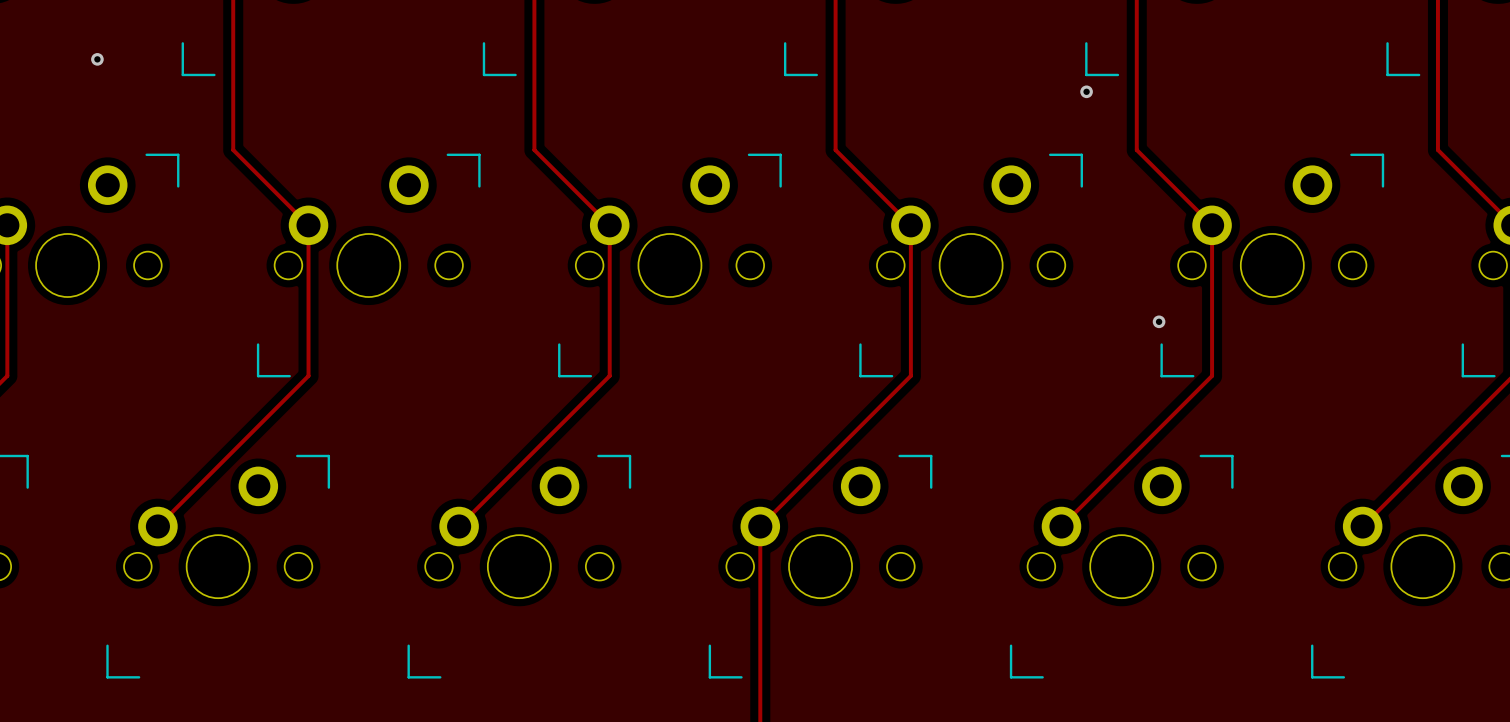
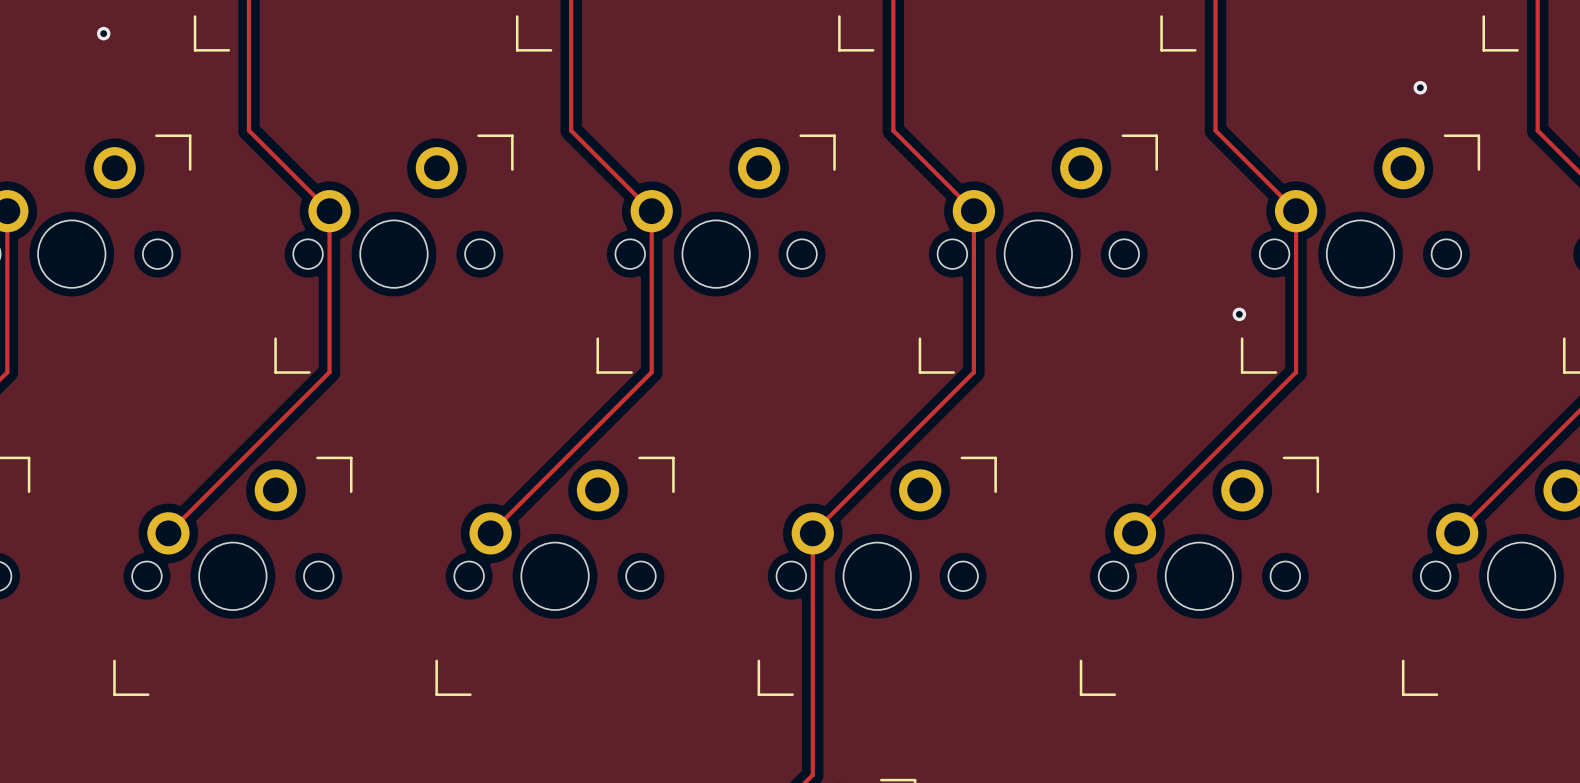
via: (1086, 91) -> none
via: none -> (1420, 87)

